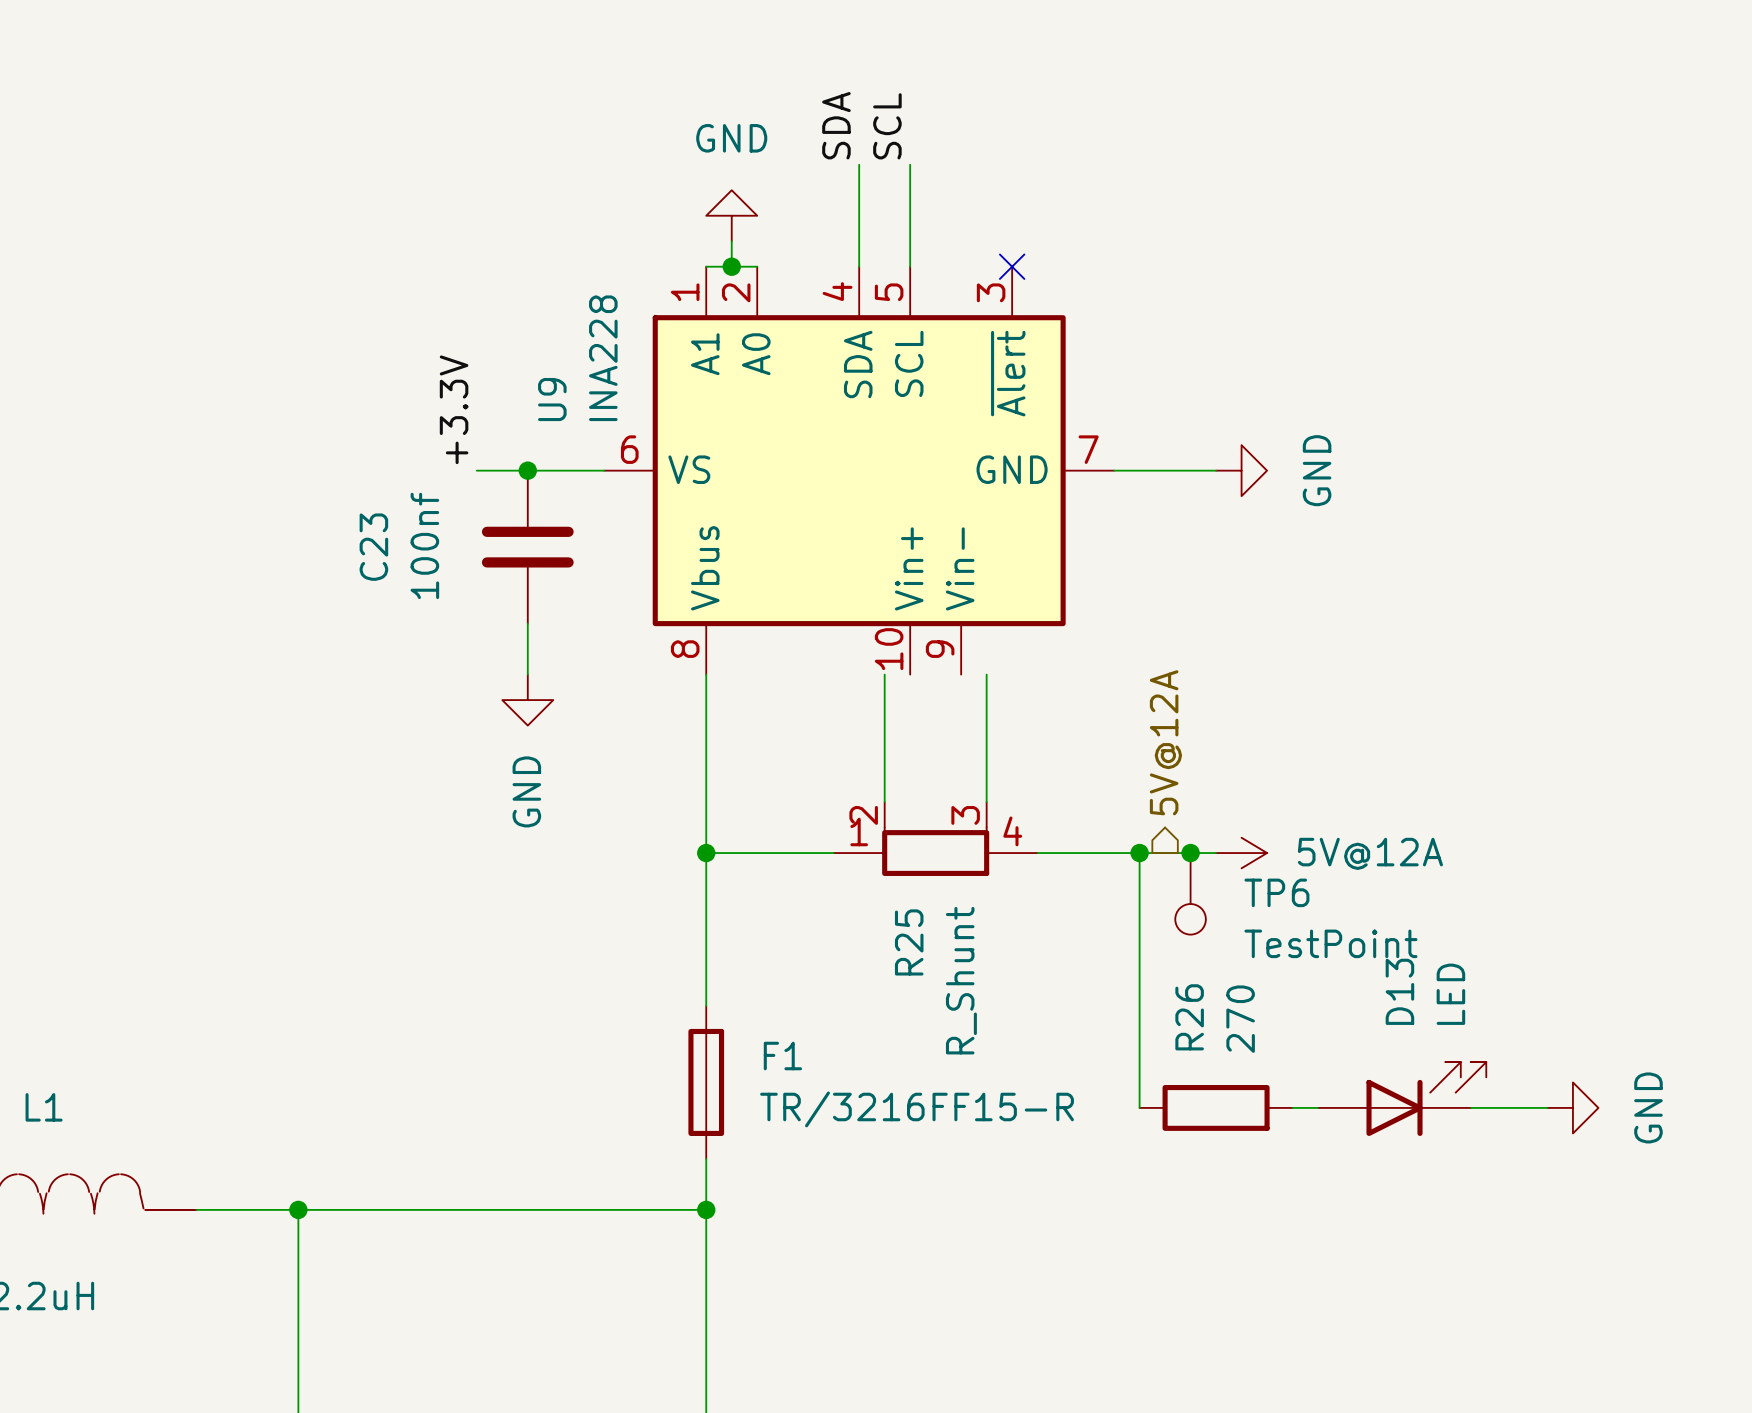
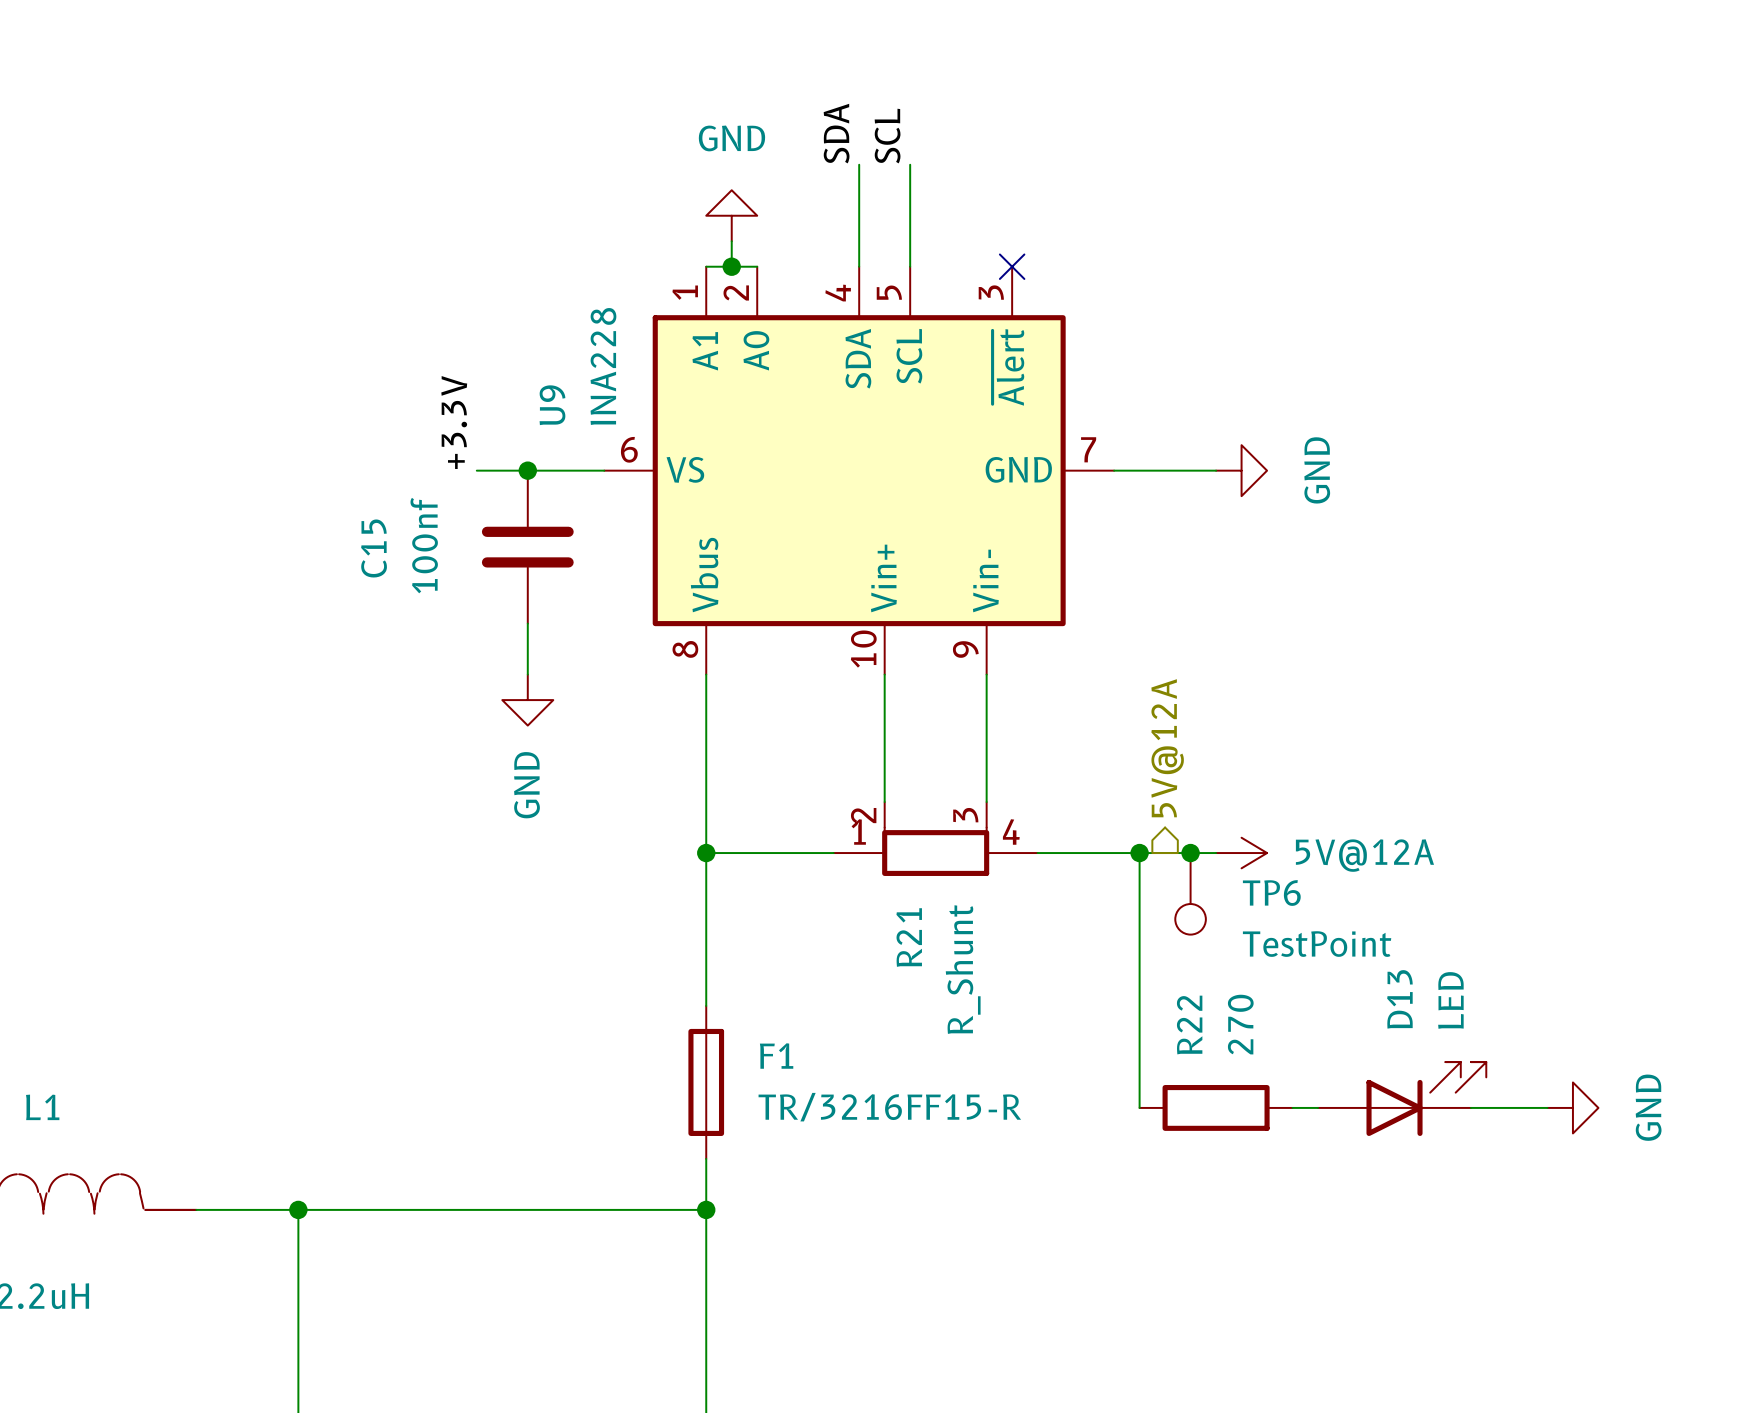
U9 symbol: [604, 266, 1115, 675] -> [604, 266, 1115, 675]
C23 name: C23 (373, 547) -> C15 (374, 548)
R25 name: R25 (909, 942) -> R21 (909, 937)
R26 name: R26 (1189, 1017) -> R22 (1189, 1025)

